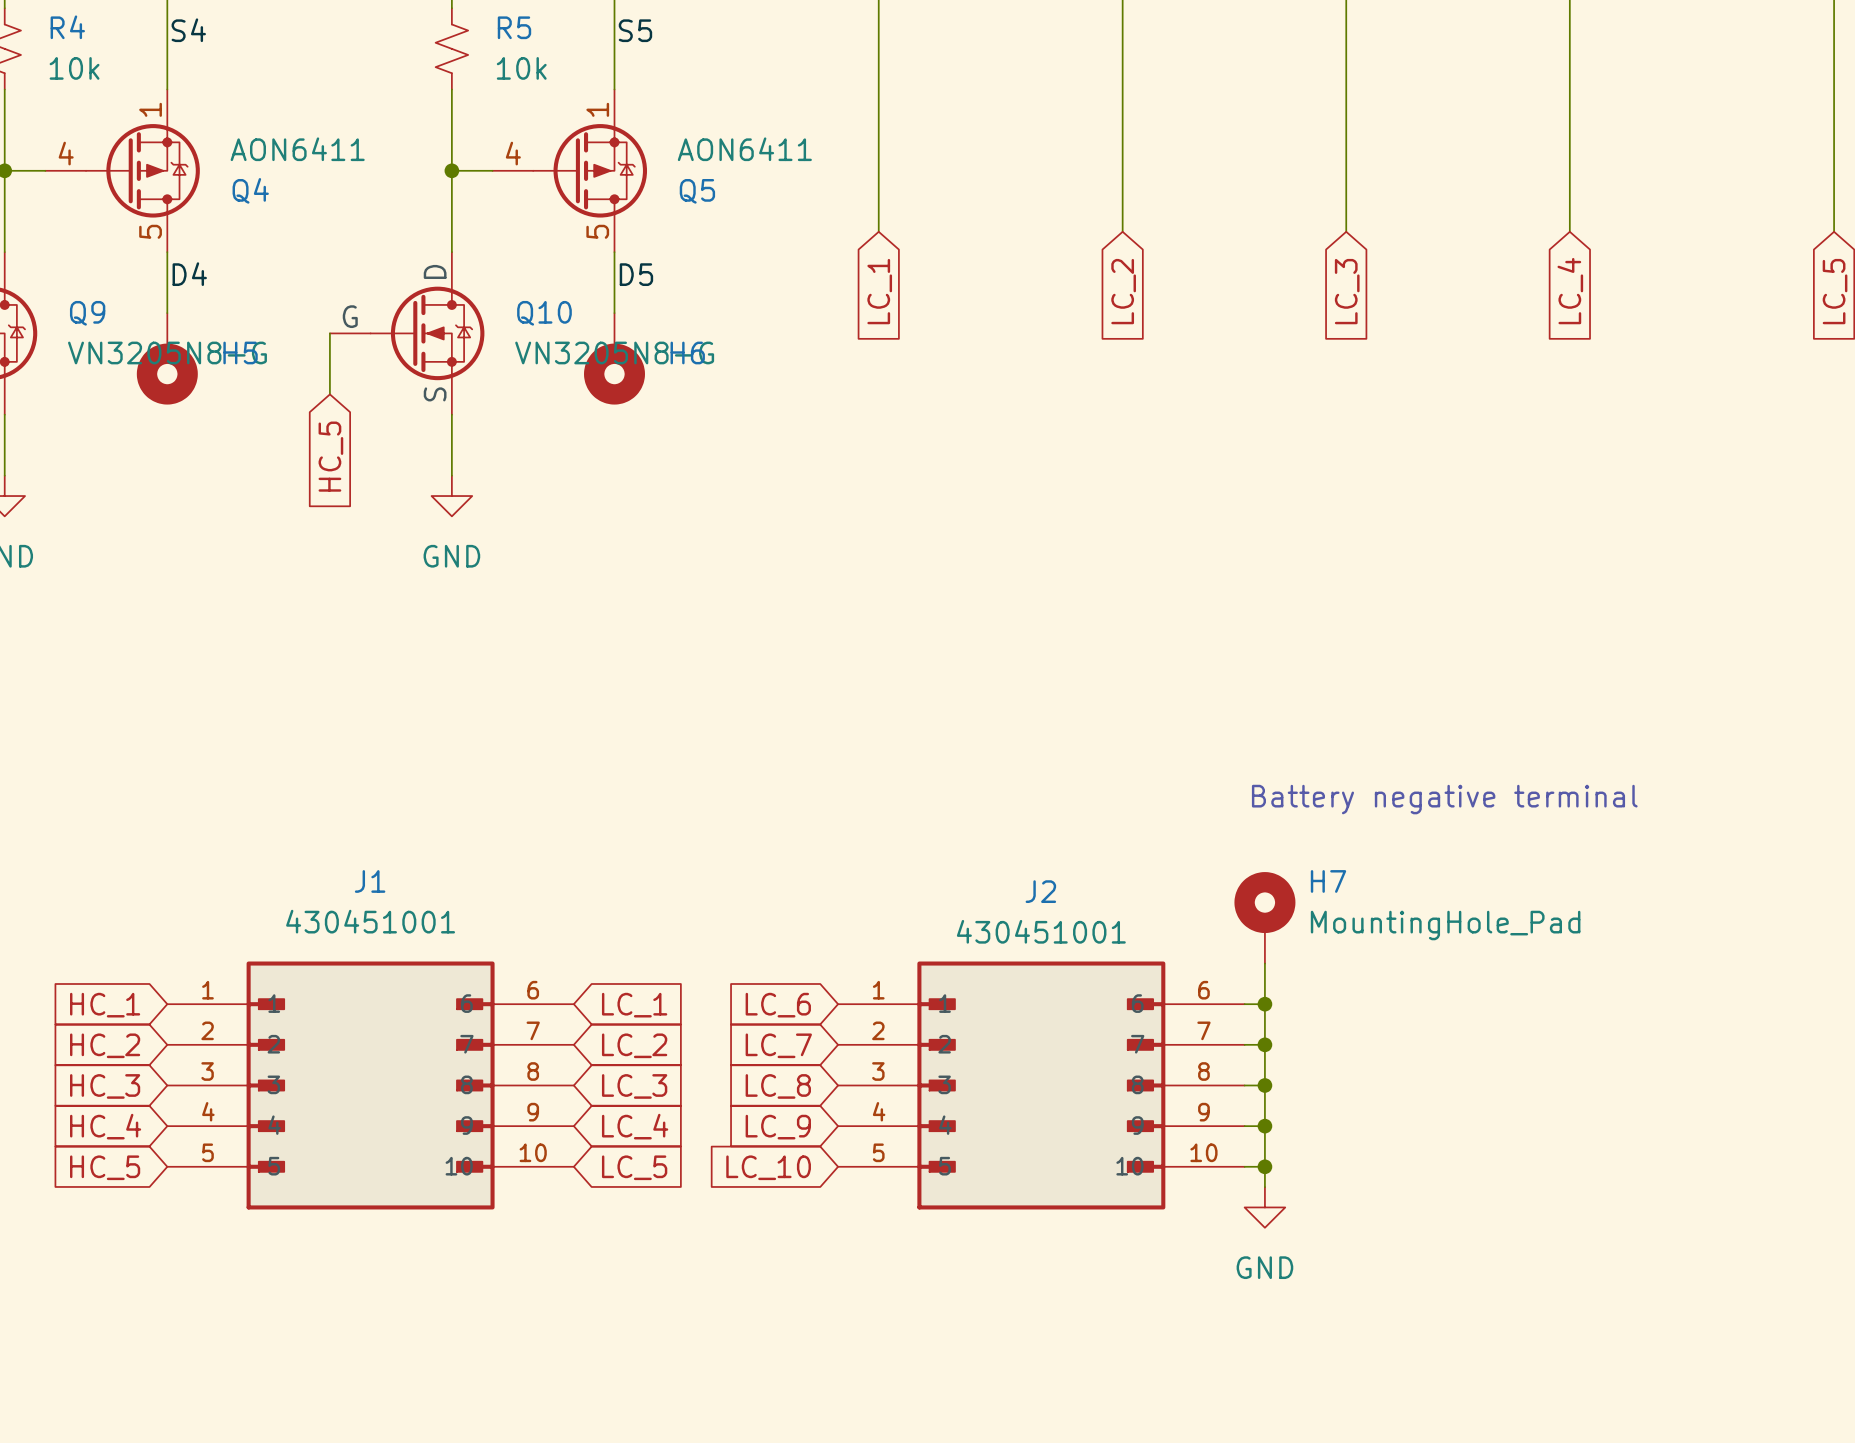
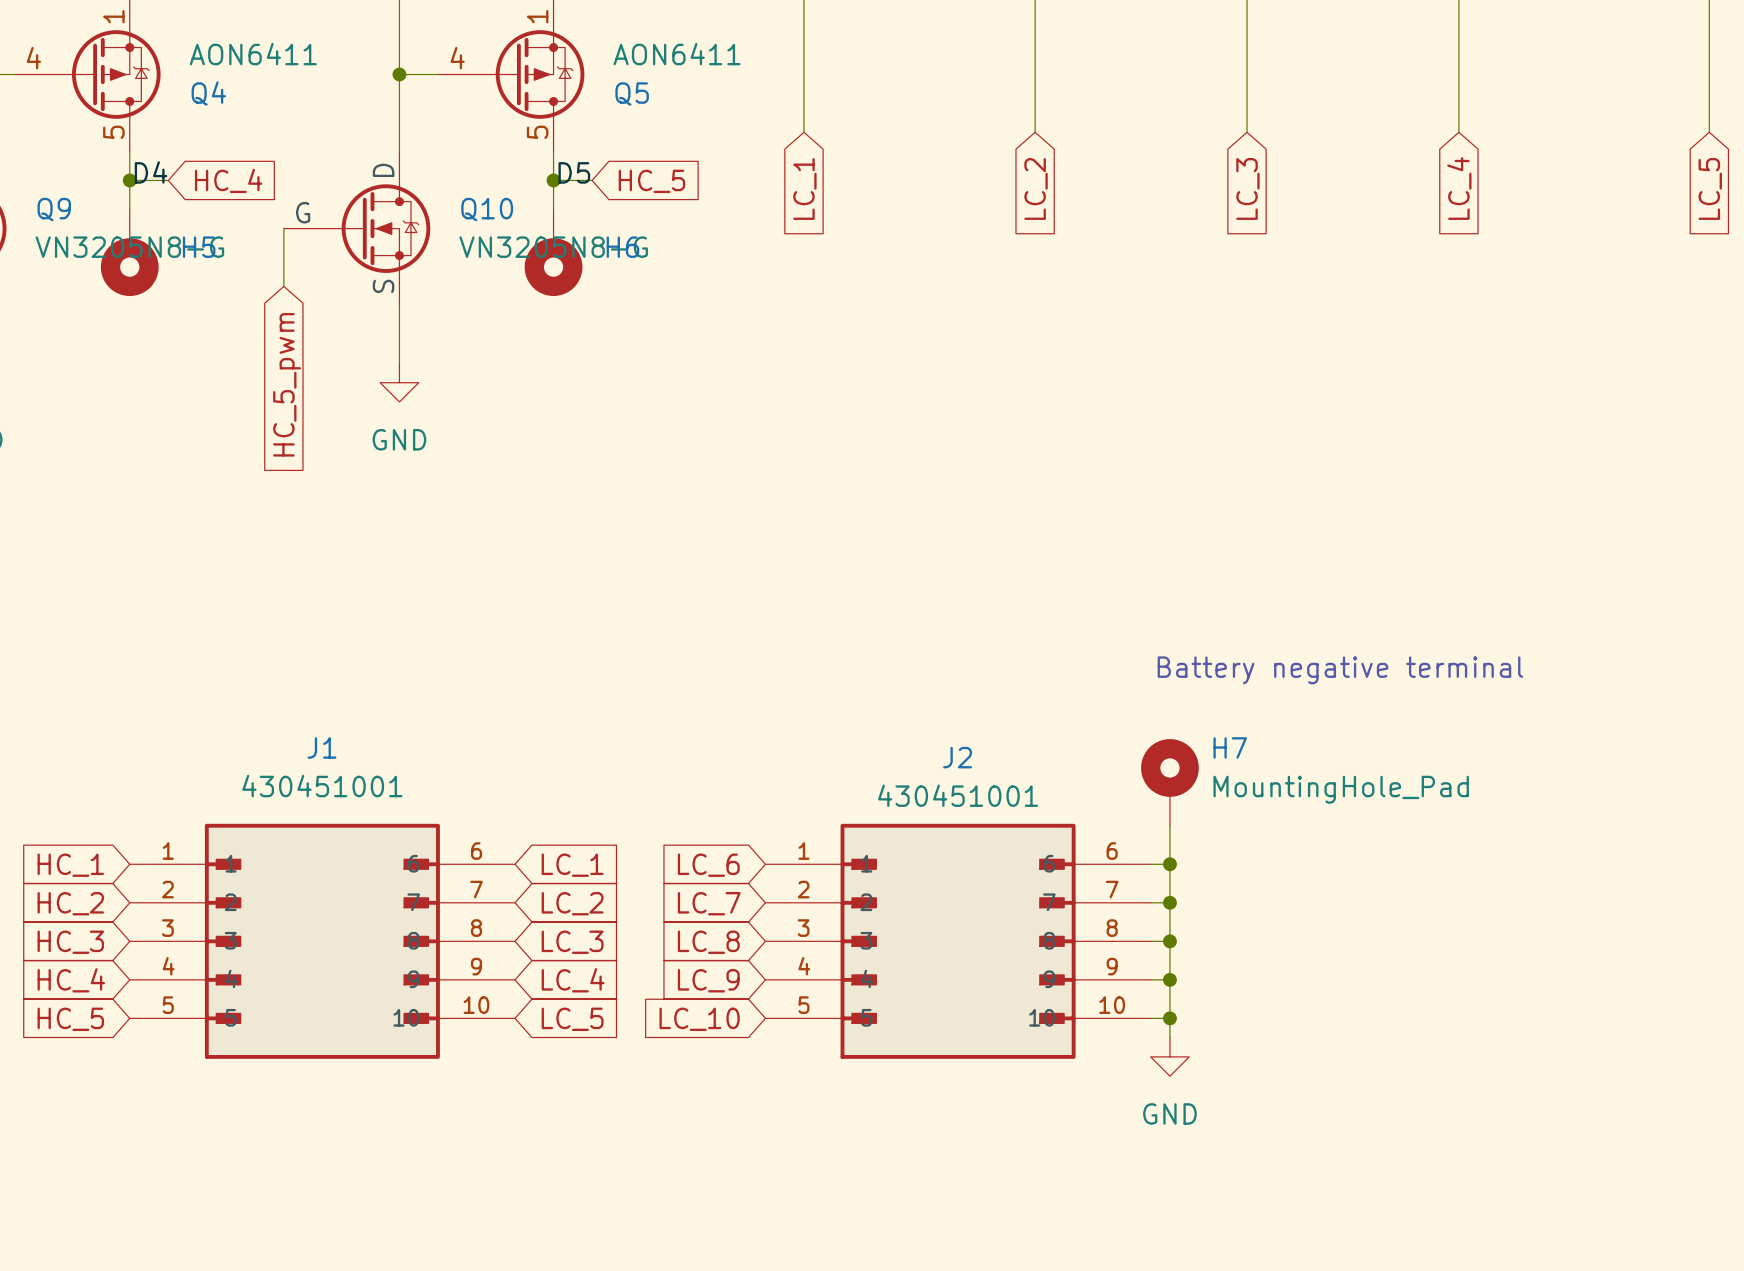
wire: none -> (129, 180) (168, 180)
junction: none -> (129, 180)
wire: none -> (553, 180) (592, 180)
junction: none -> (553, 180)
global label: none -> HC_4 (228, 180)
global label: none -> HC_5 (651, 181)
global label: HC_5 (330, 456) -> HC_5_pwm (287, 384)

